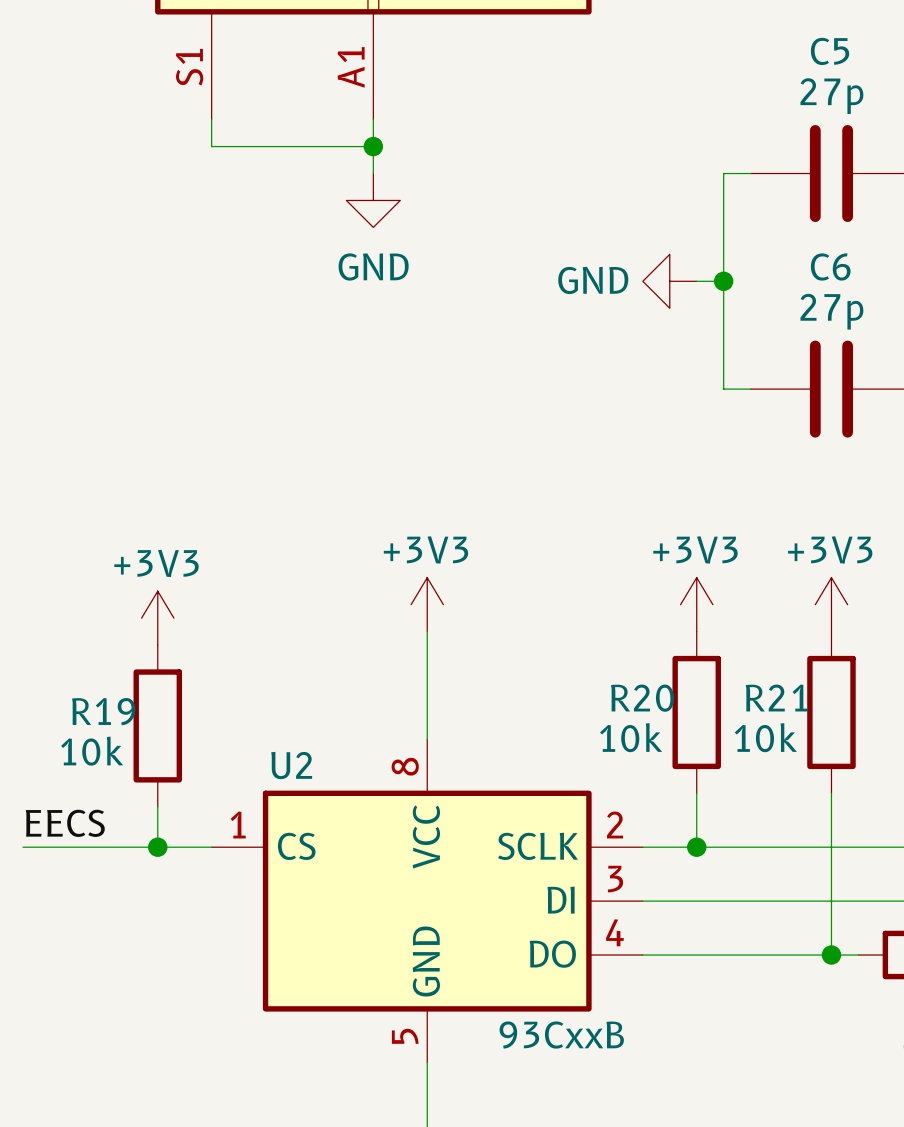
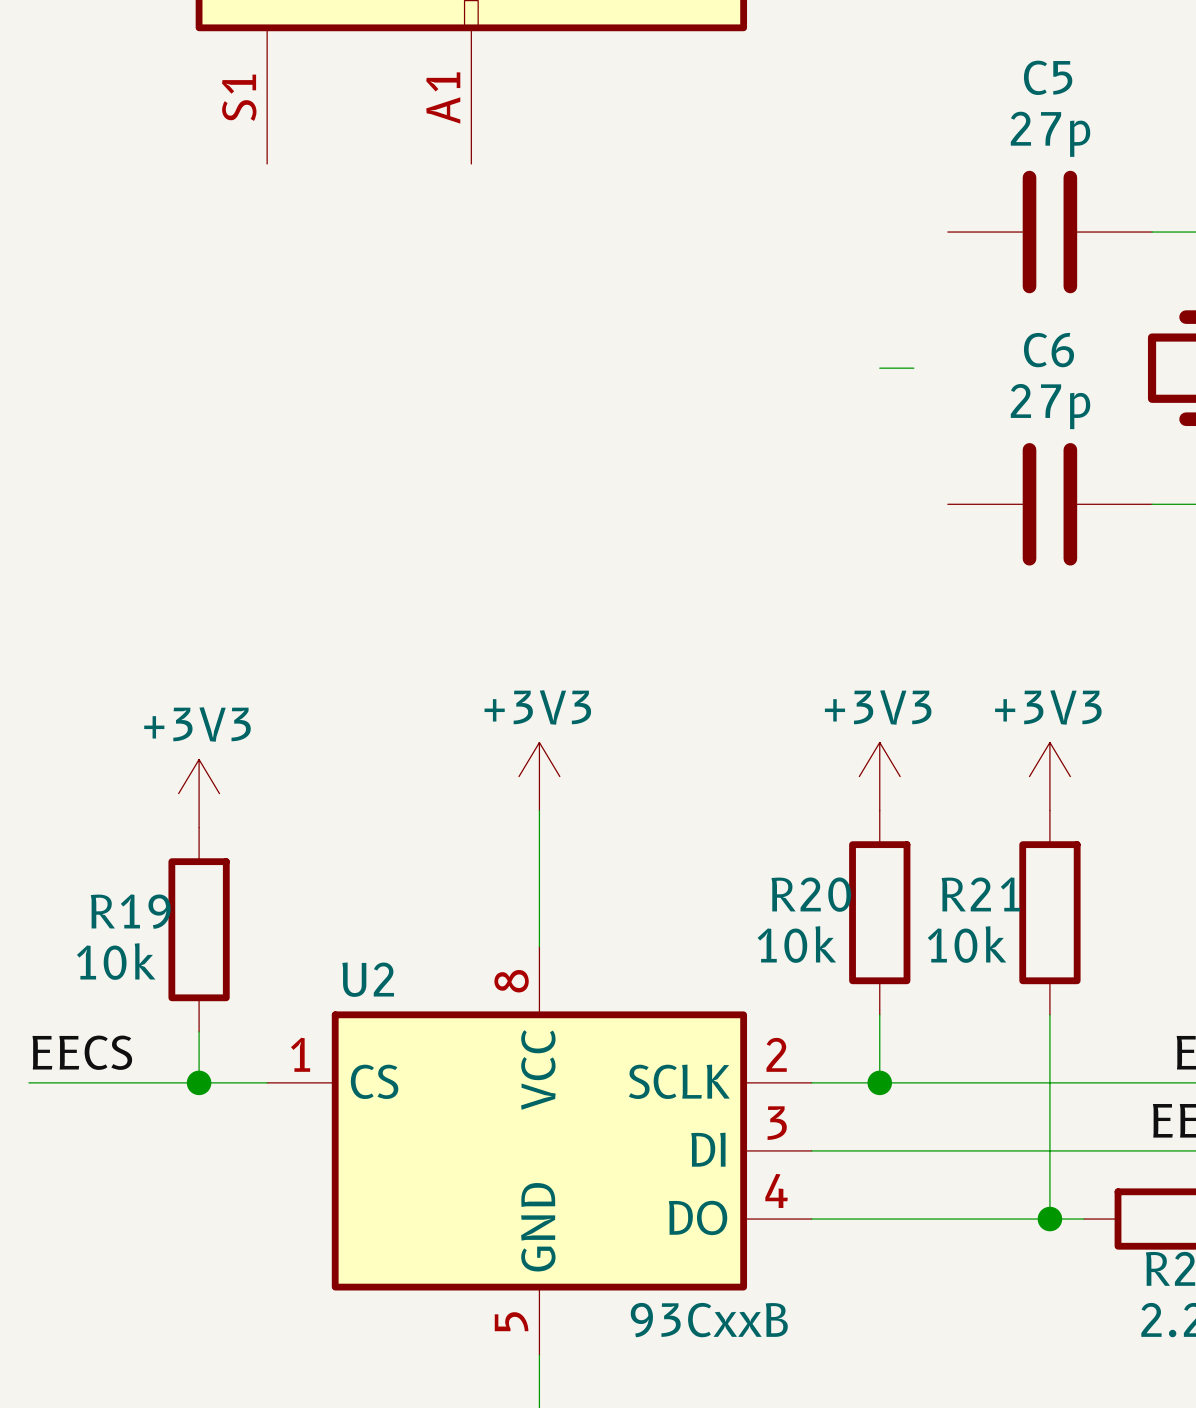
wire: (211, 119) (211, 146) (373, 146) -> none
wire: (373, 119) (373, 173) -> none
junction: (373, 146) -> none
wire: (750, 173) (723, 173) (723, 389) (750, 389) -> none
power symbol: GND (373, 200) -> none
power symbol: GND (669, 281) -> none
junction: (723, 281) -> none

